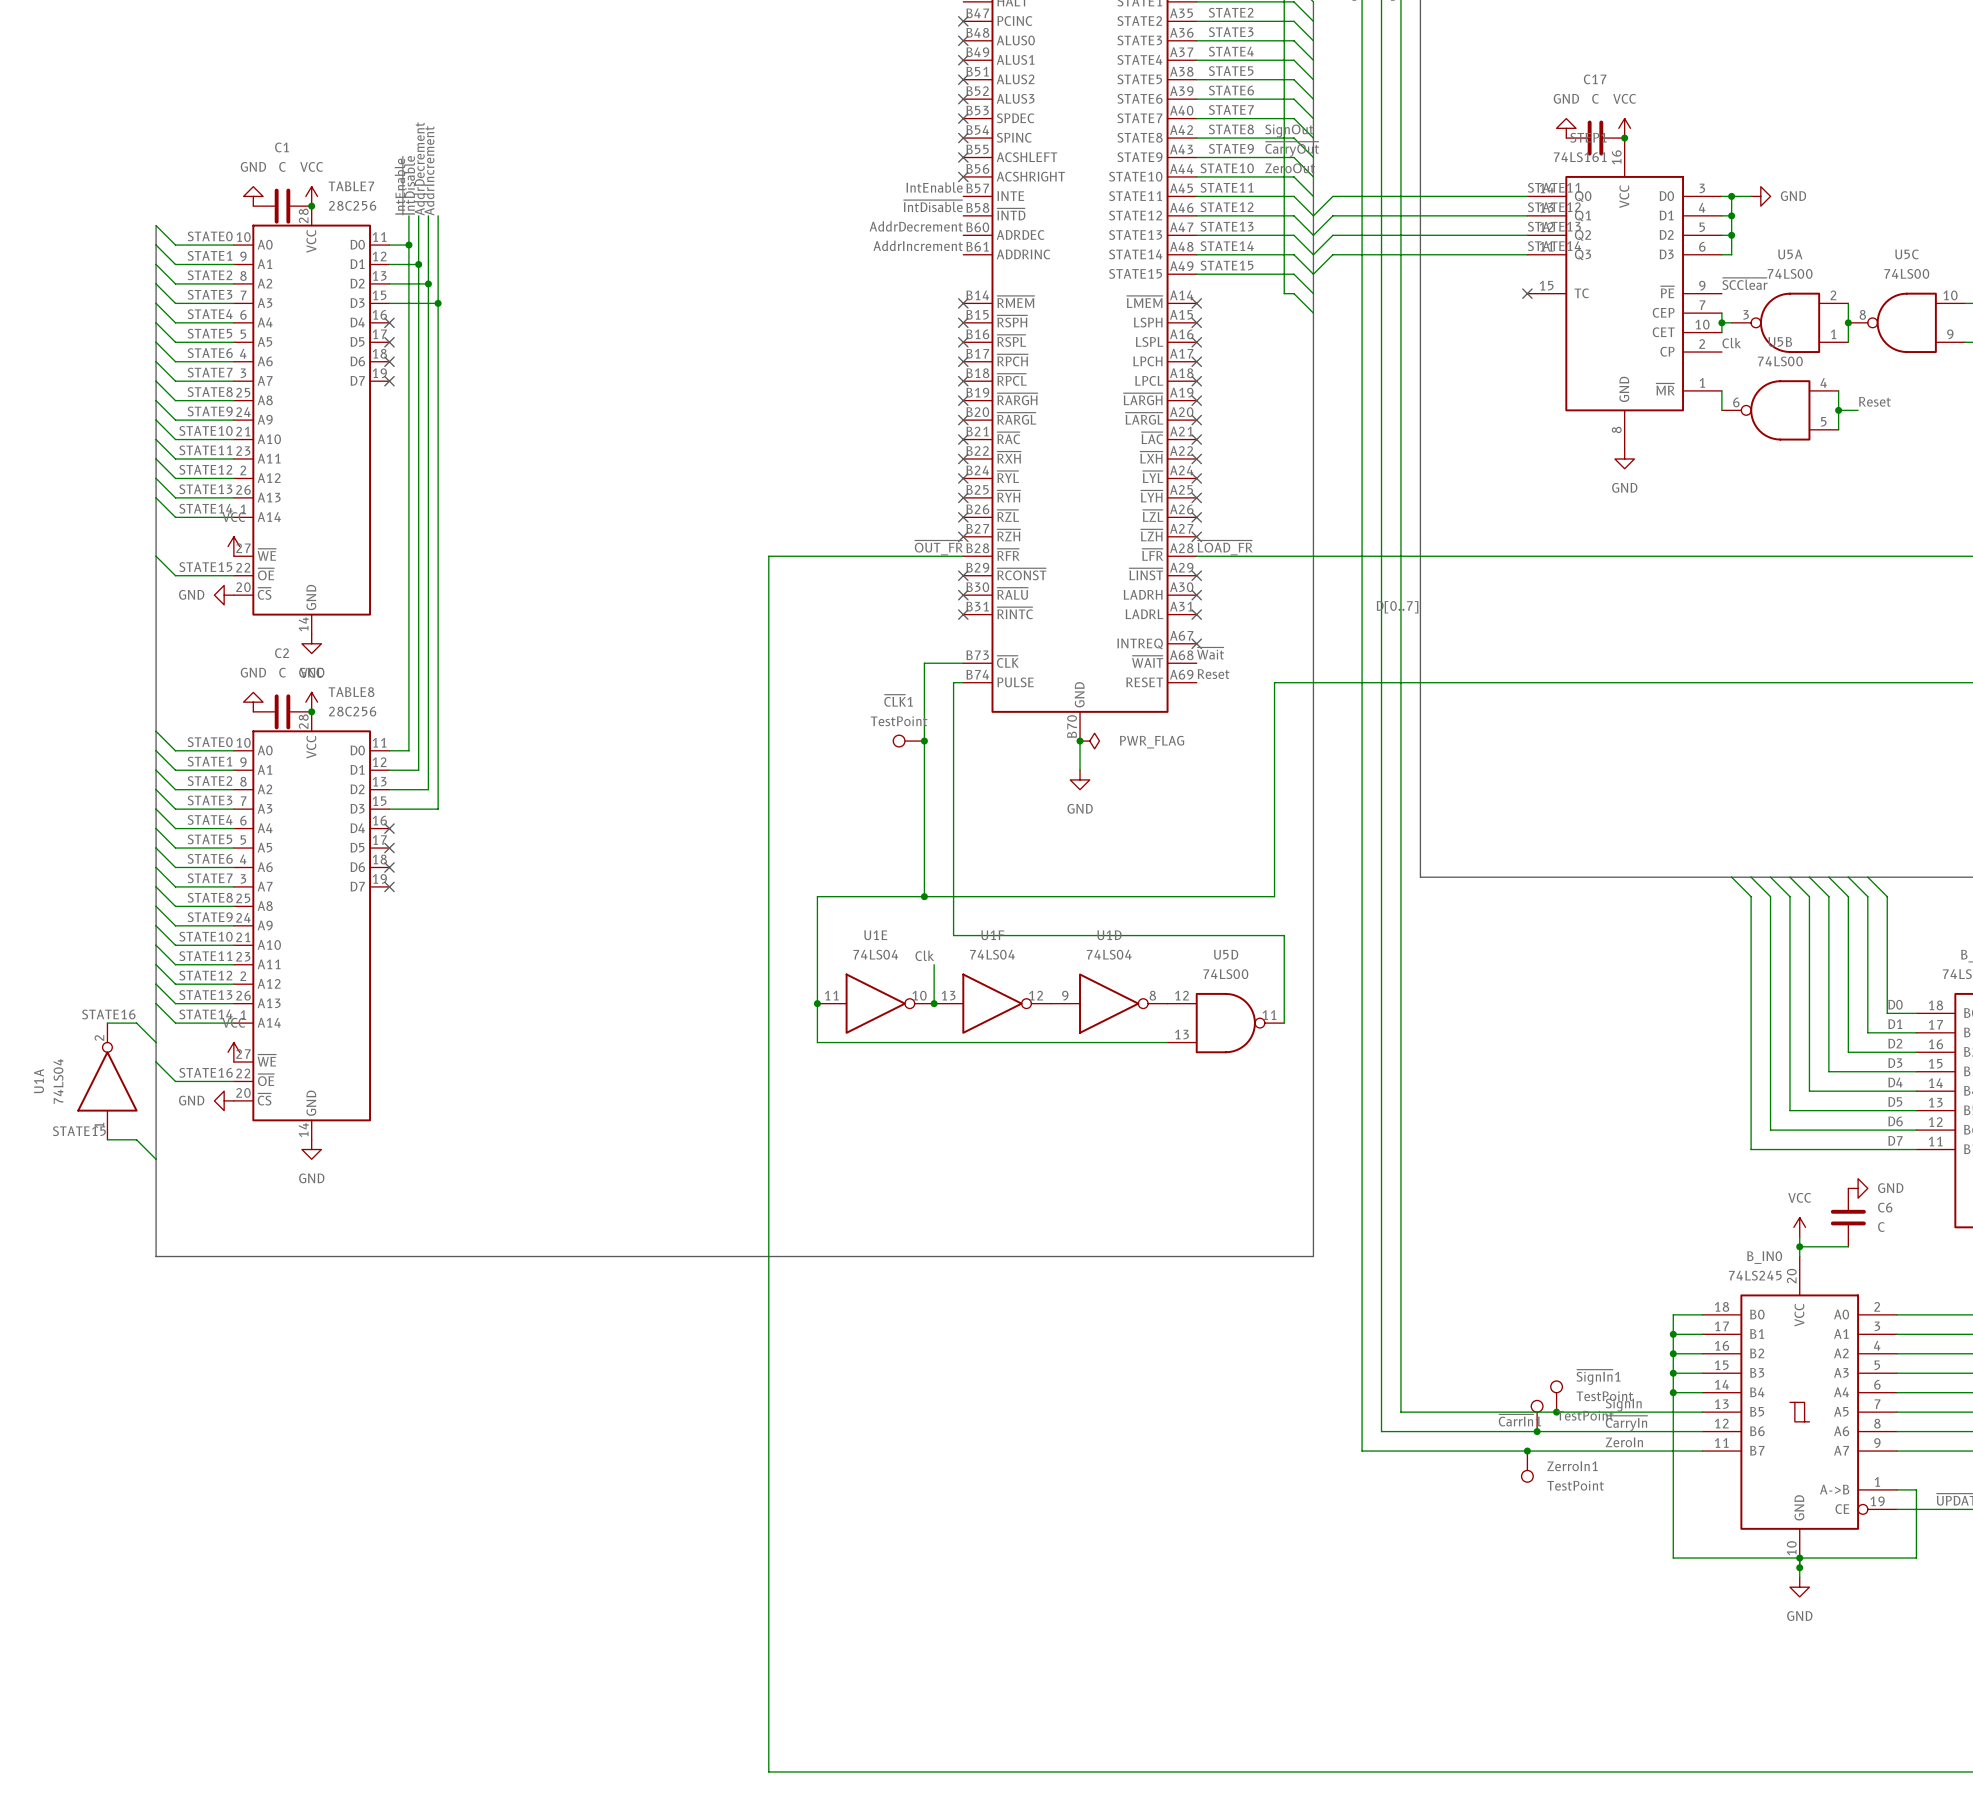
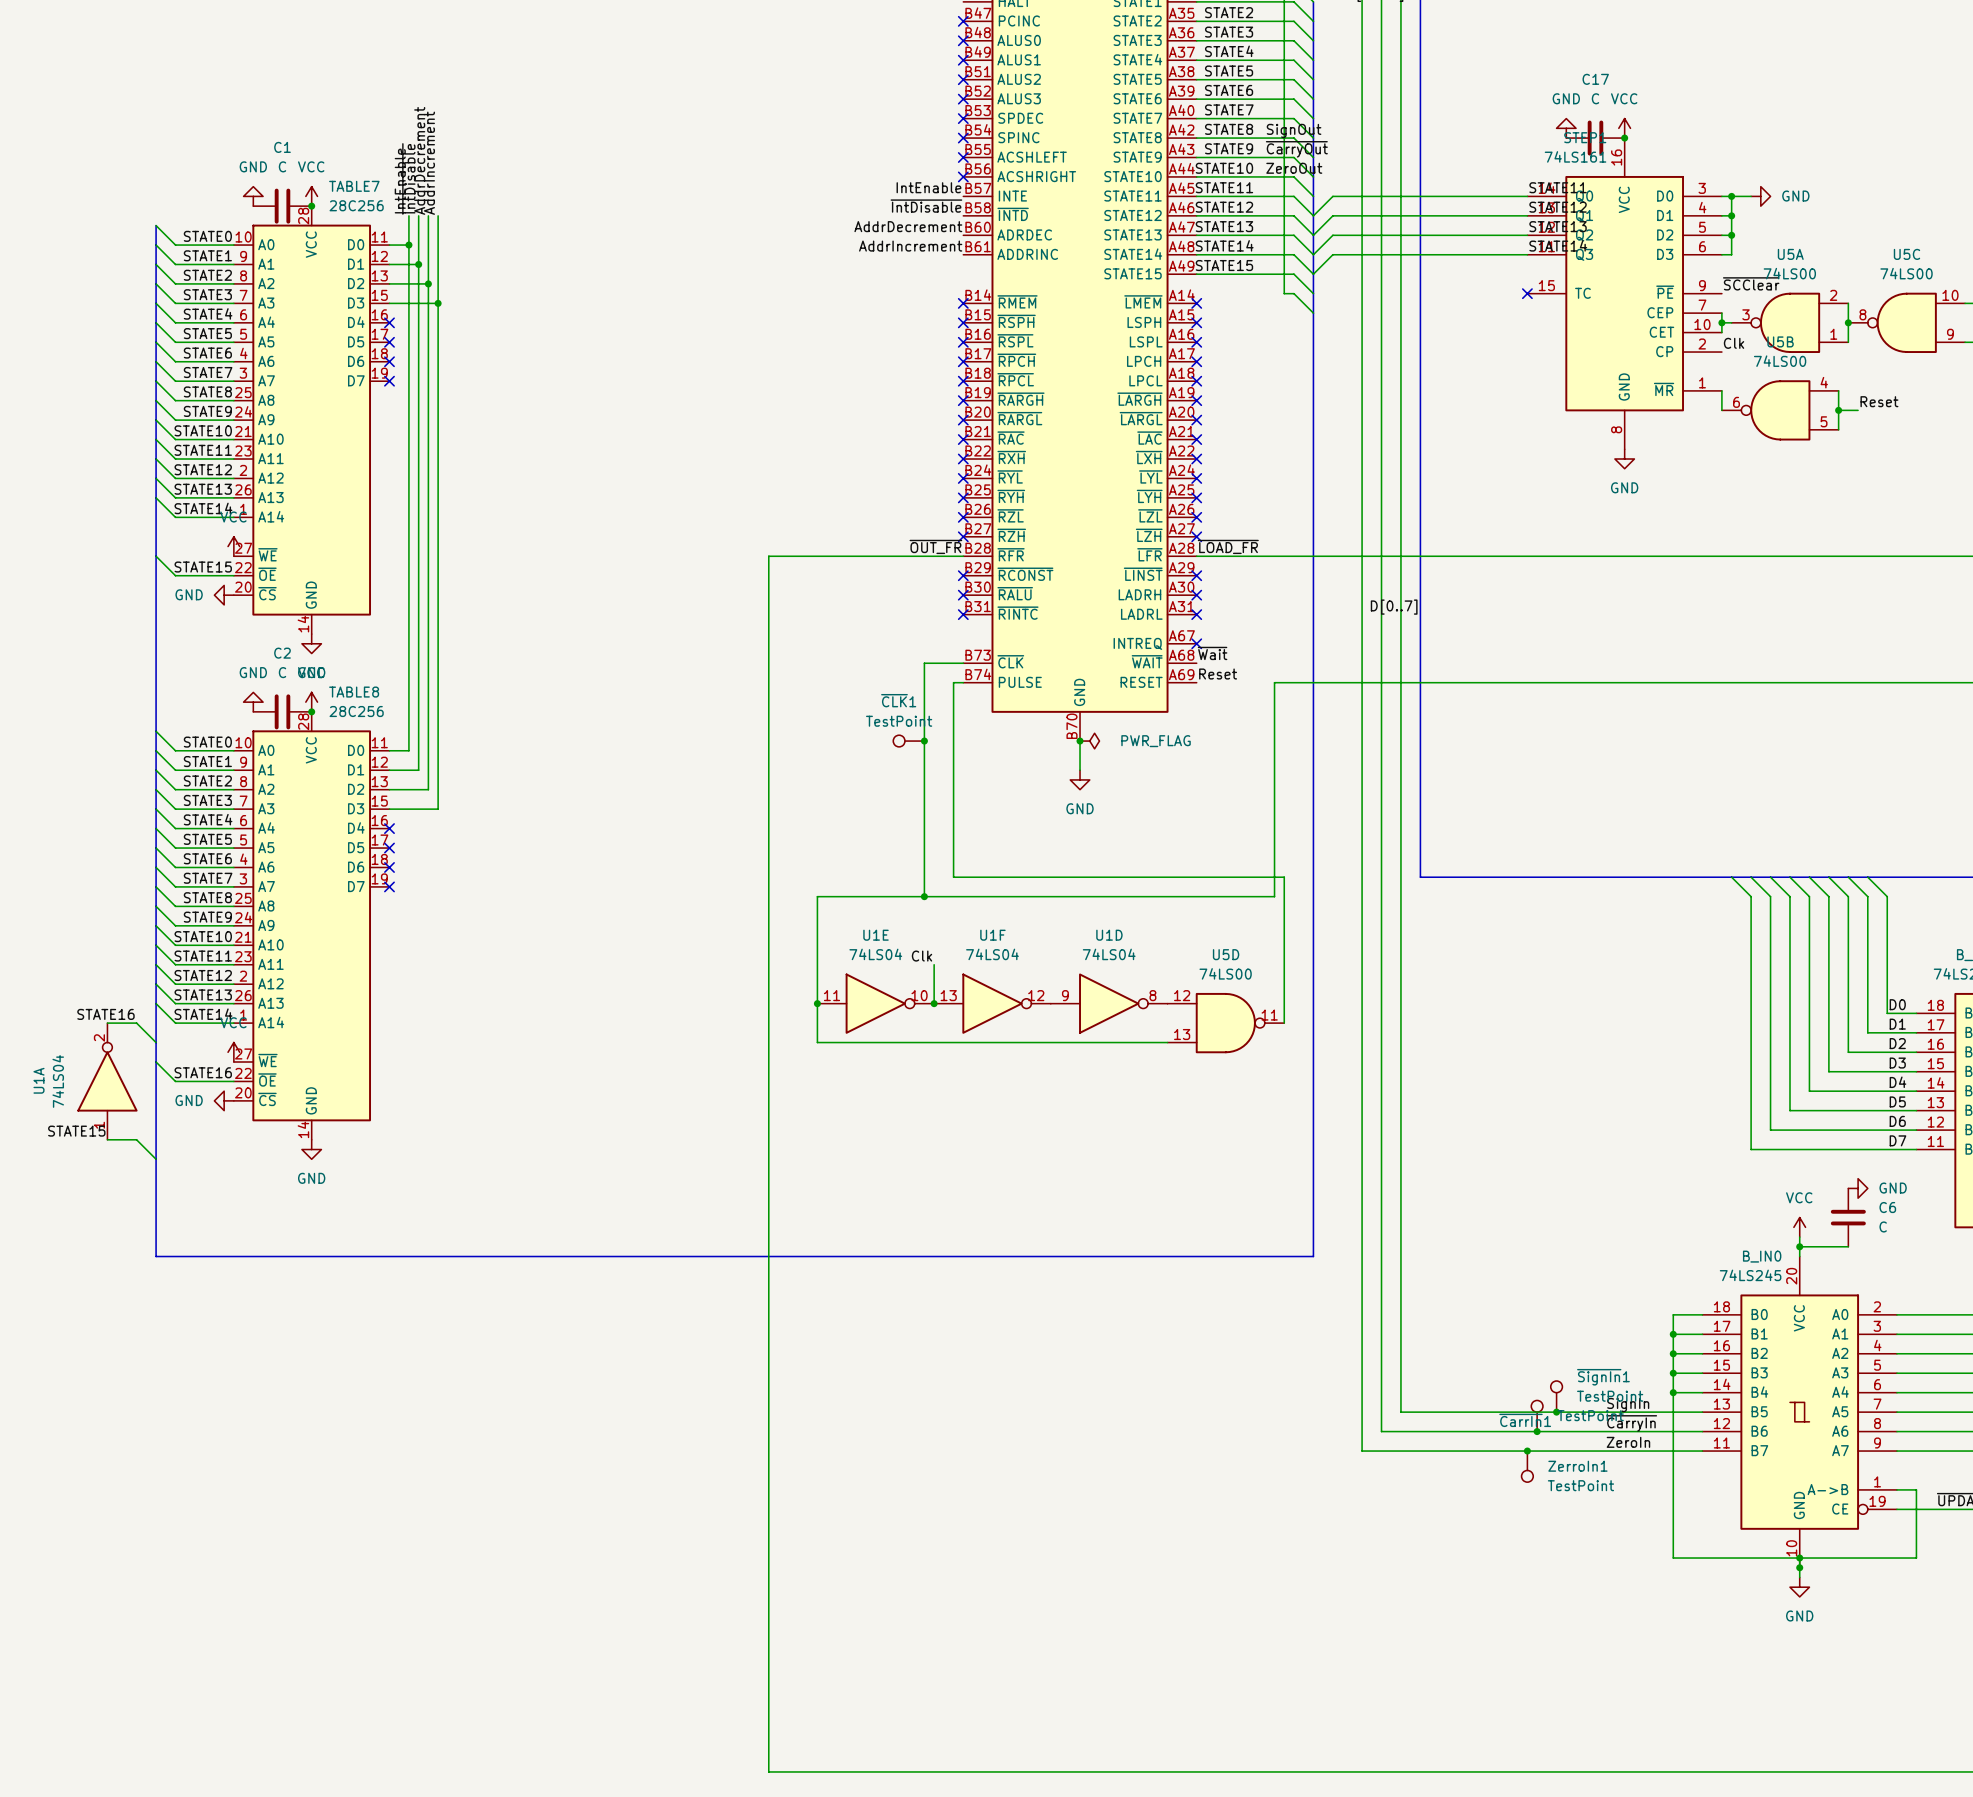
wire: (953, 877) (953, 935) (1284, 935) -> (953, 877) (1284, 877) (1284, 935)

